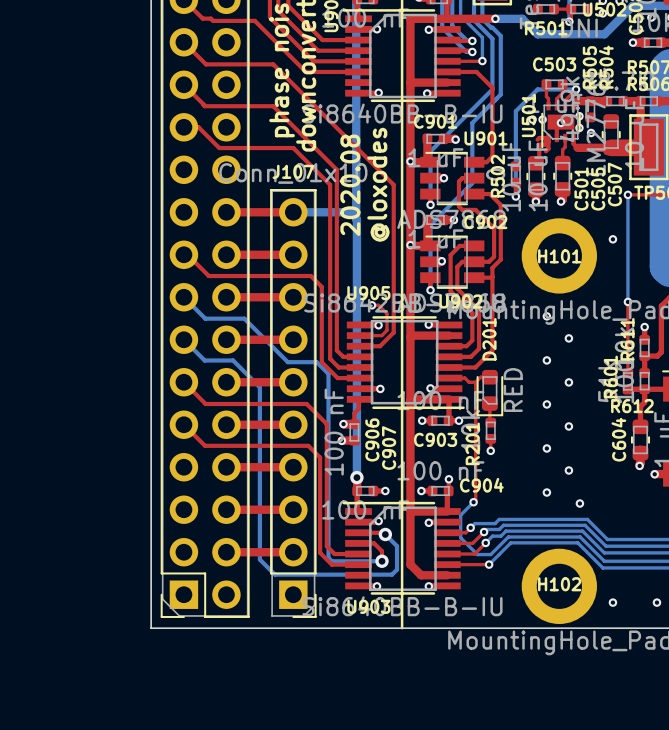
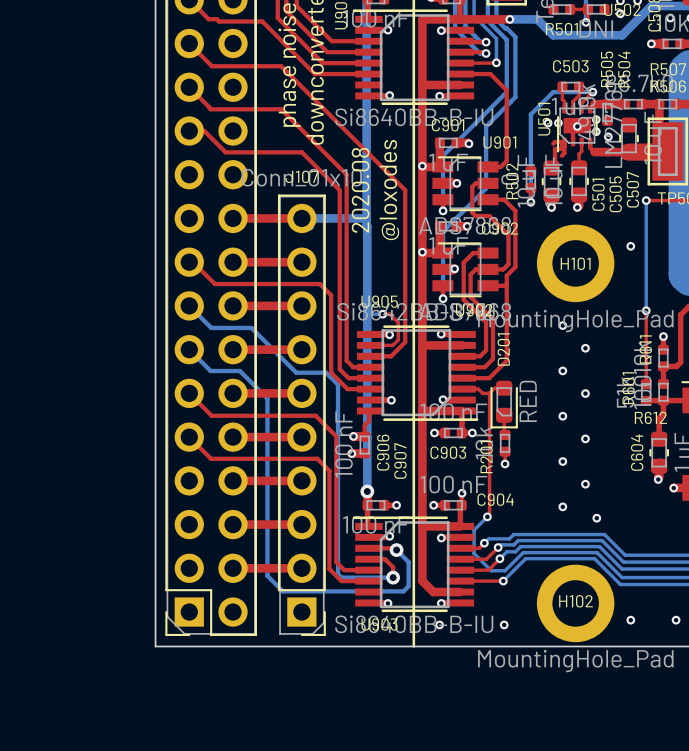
via: none -> (439, 624)
via: none -> (504, 624)

